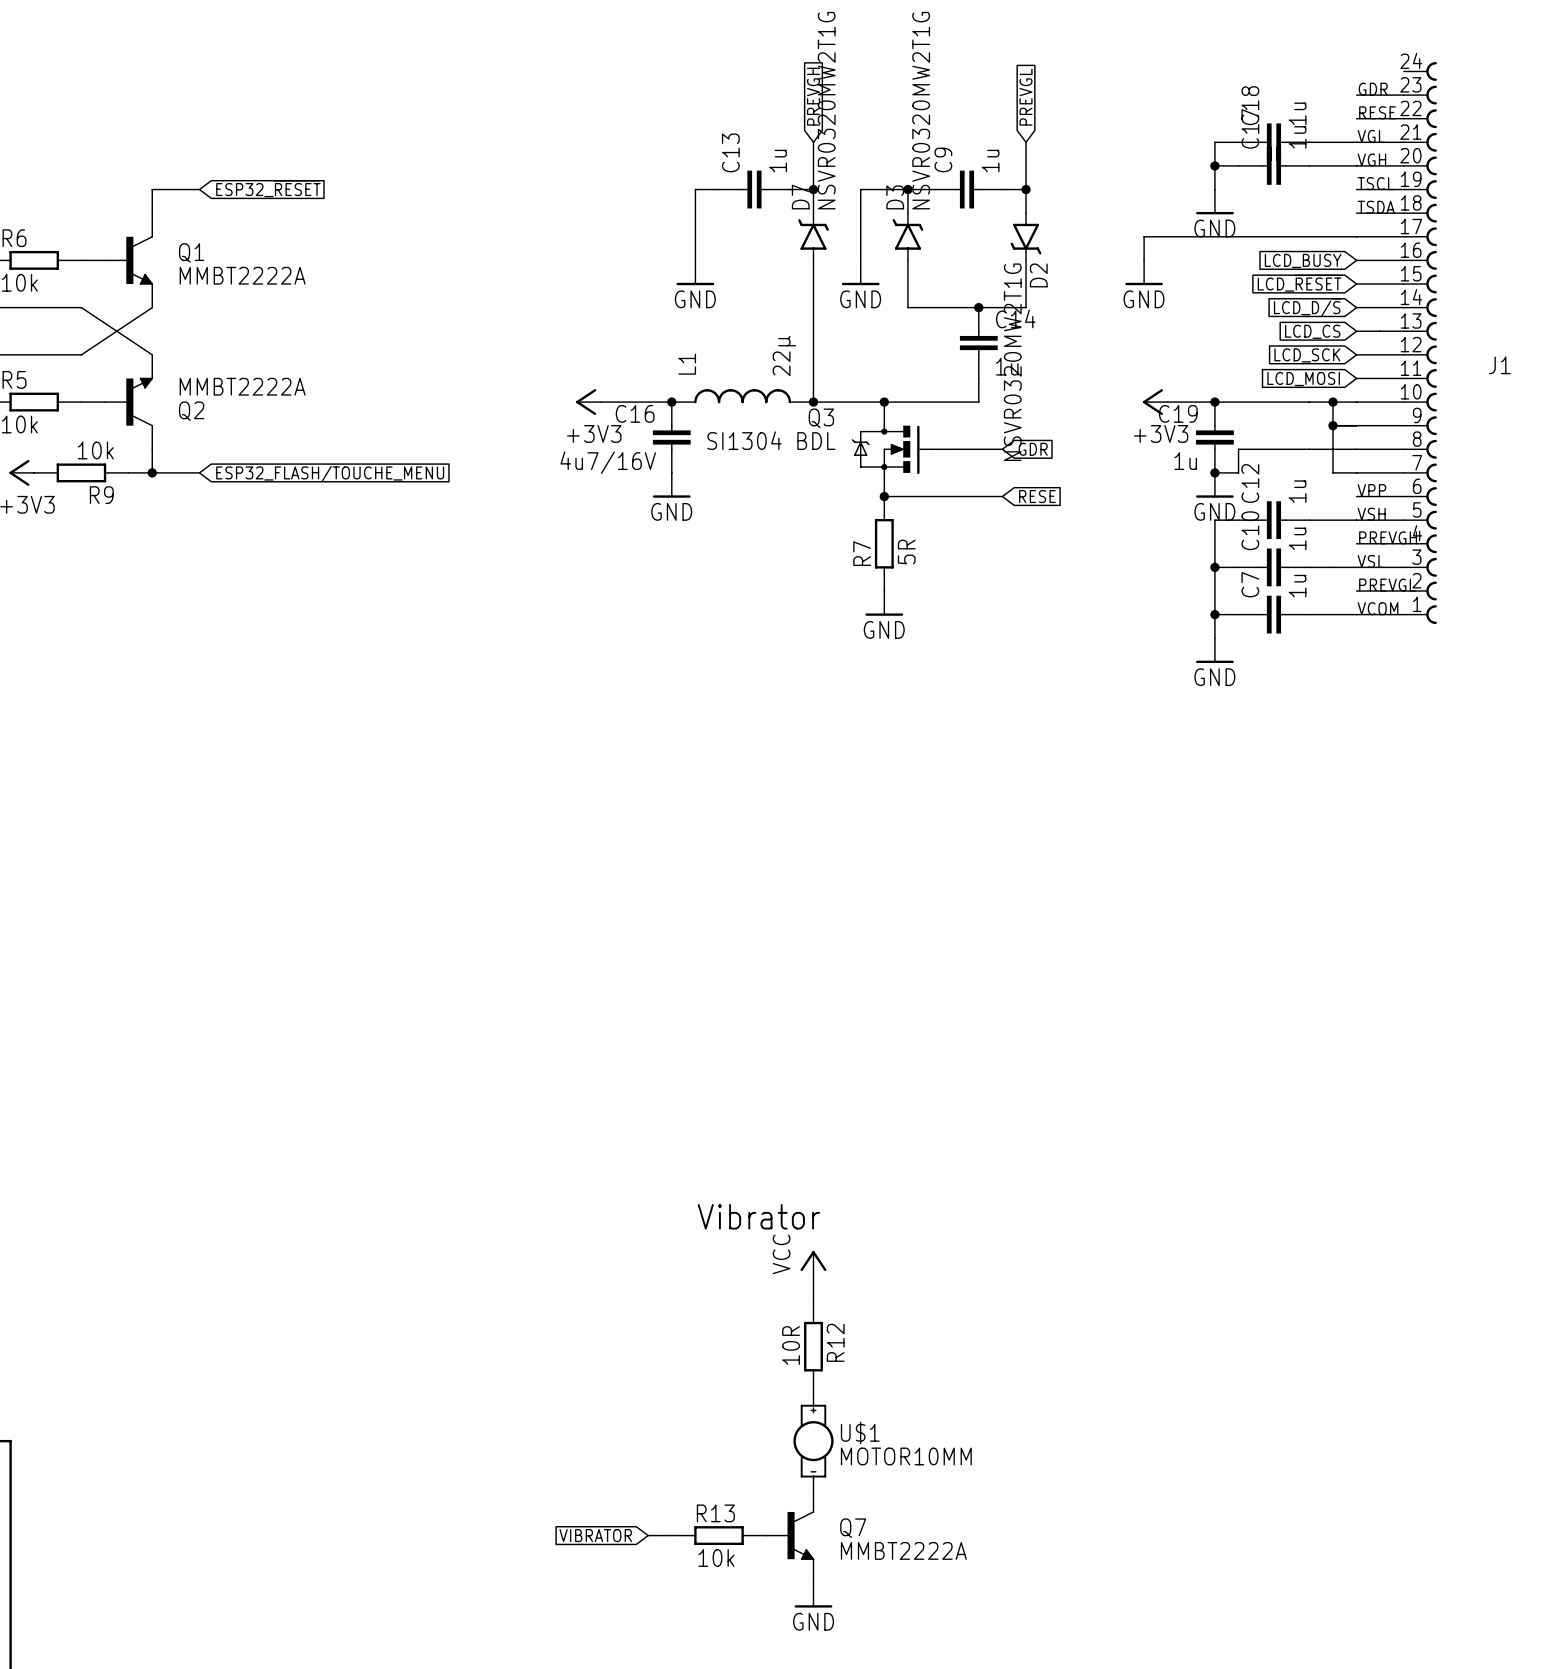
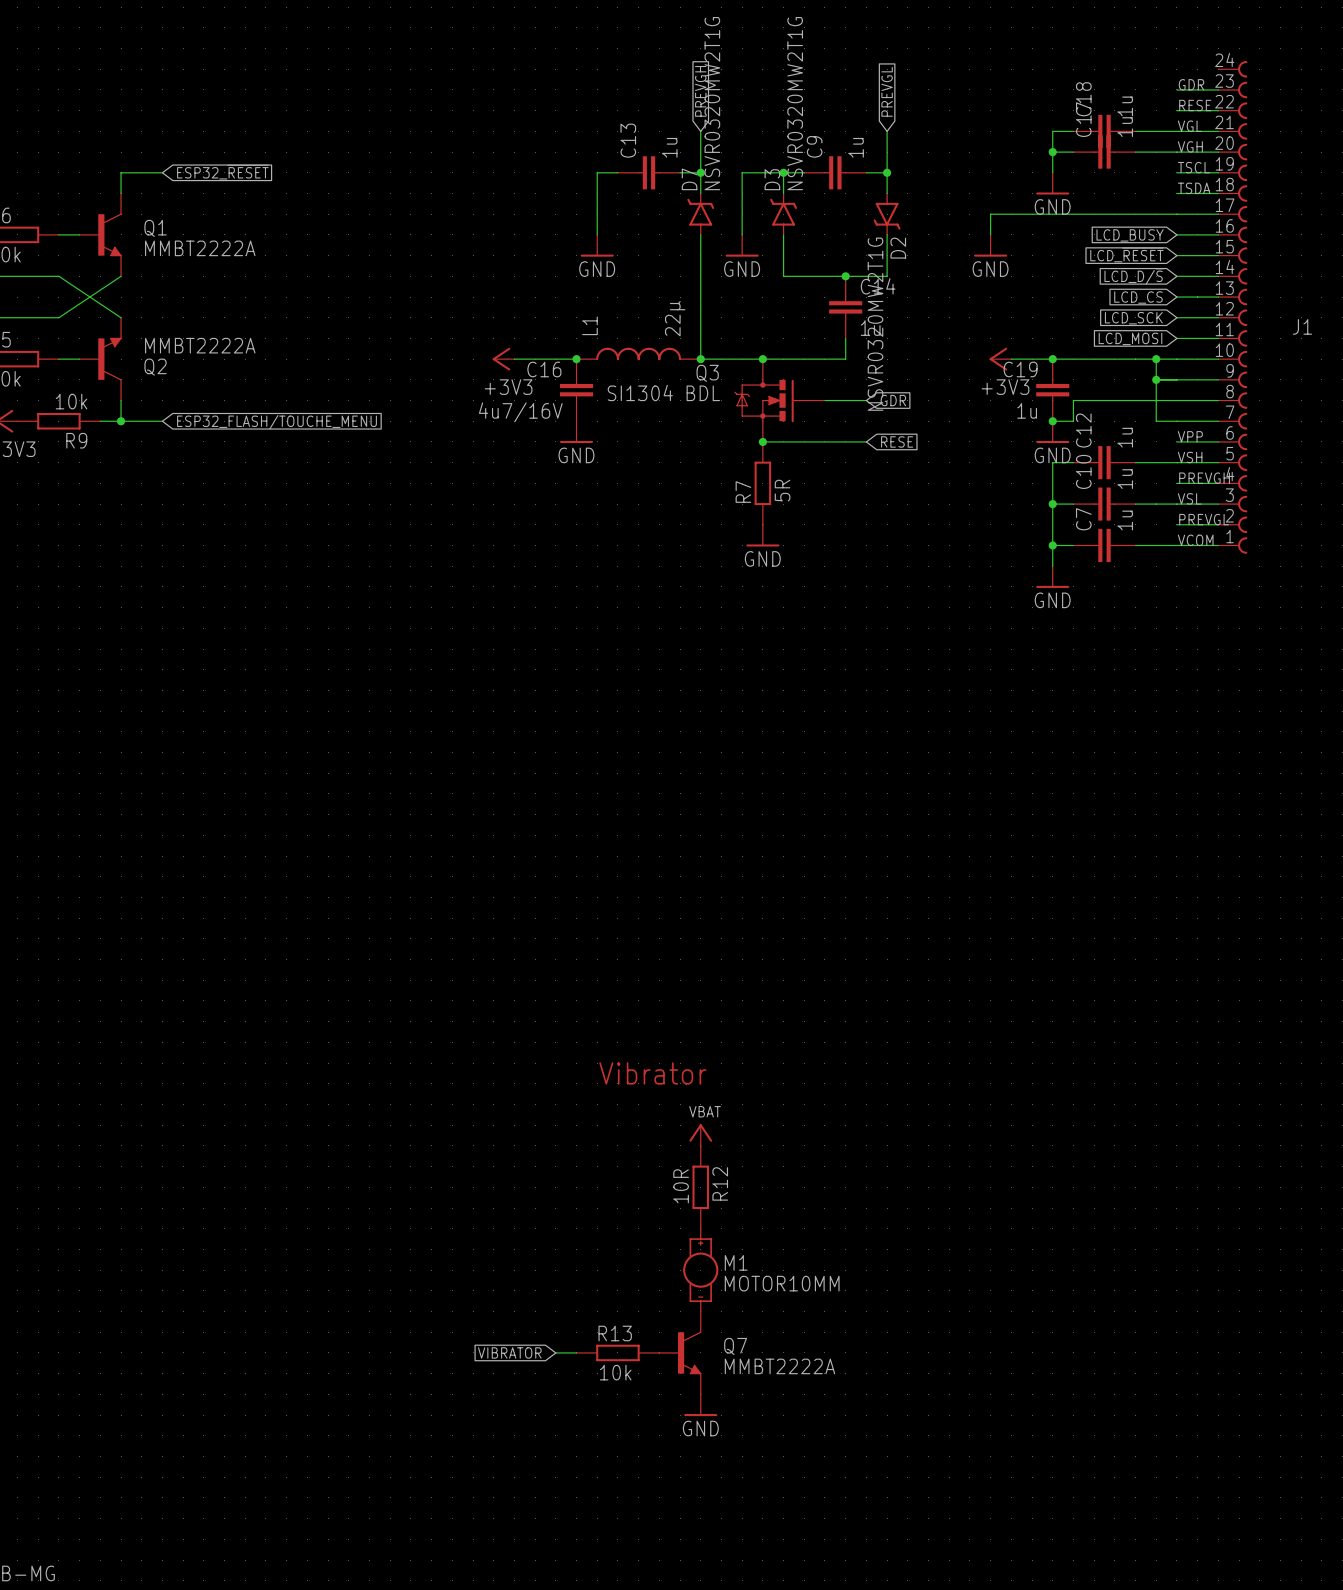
power symbol: VCC (813, 1263) -> none
power symbol: none -> VBAT (700, 1135)
U$1 name: U$1 (860, 1432) -> M1 (736, 1262)

